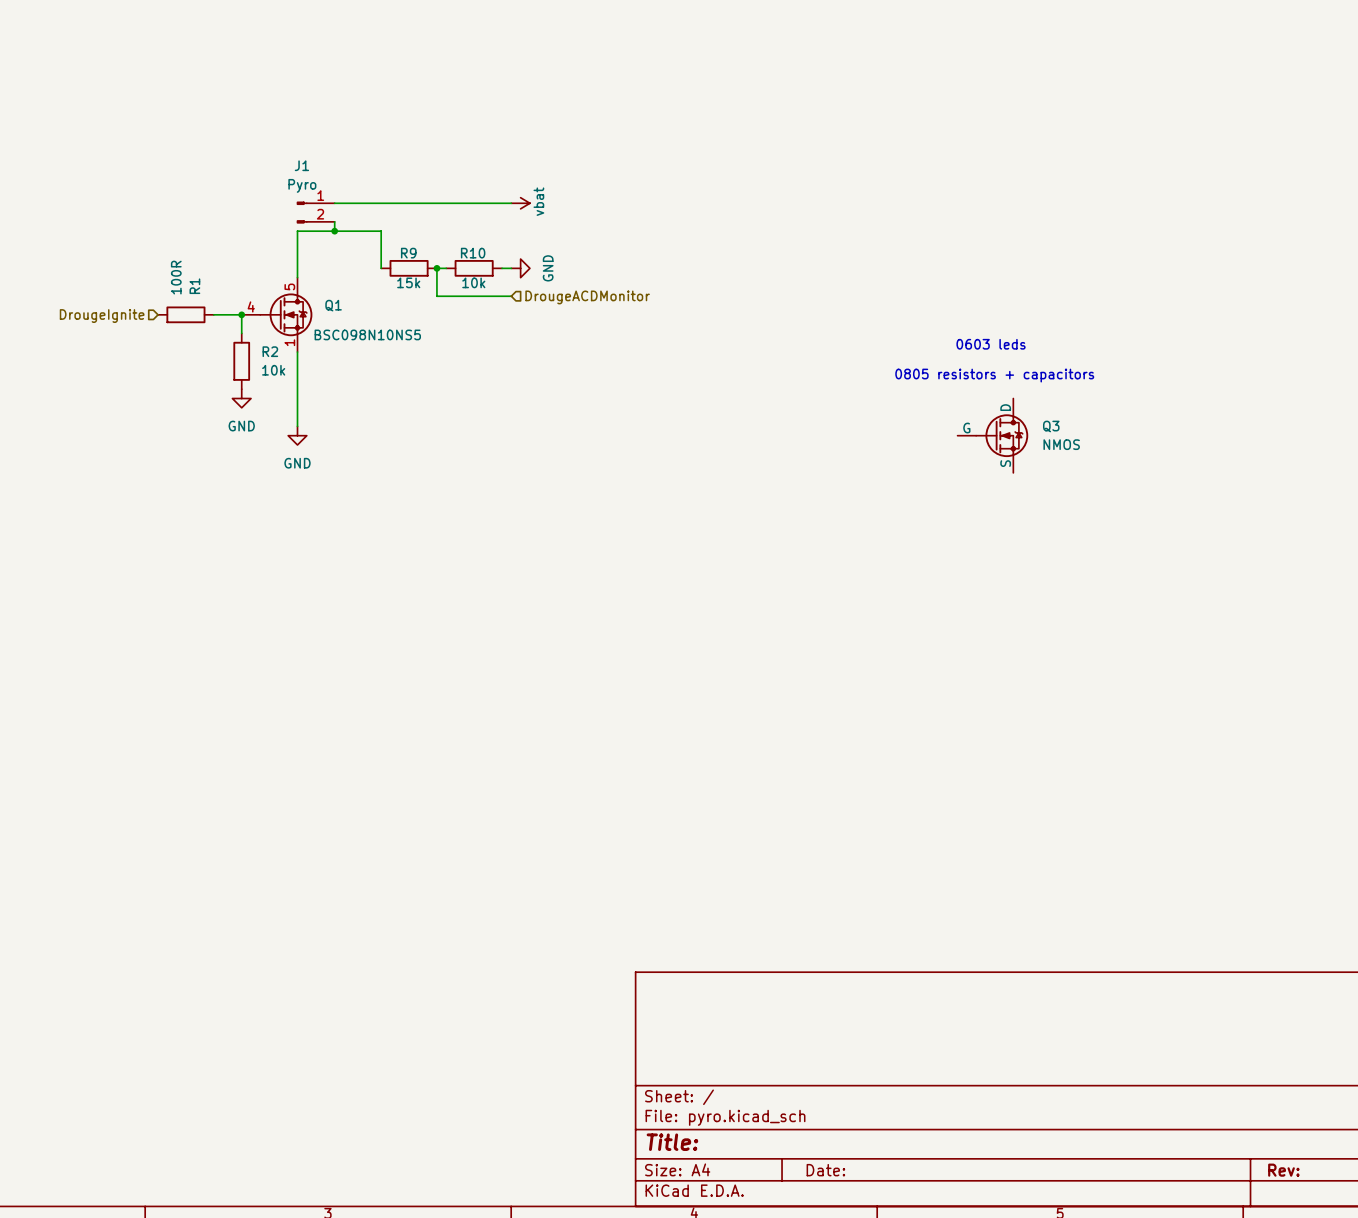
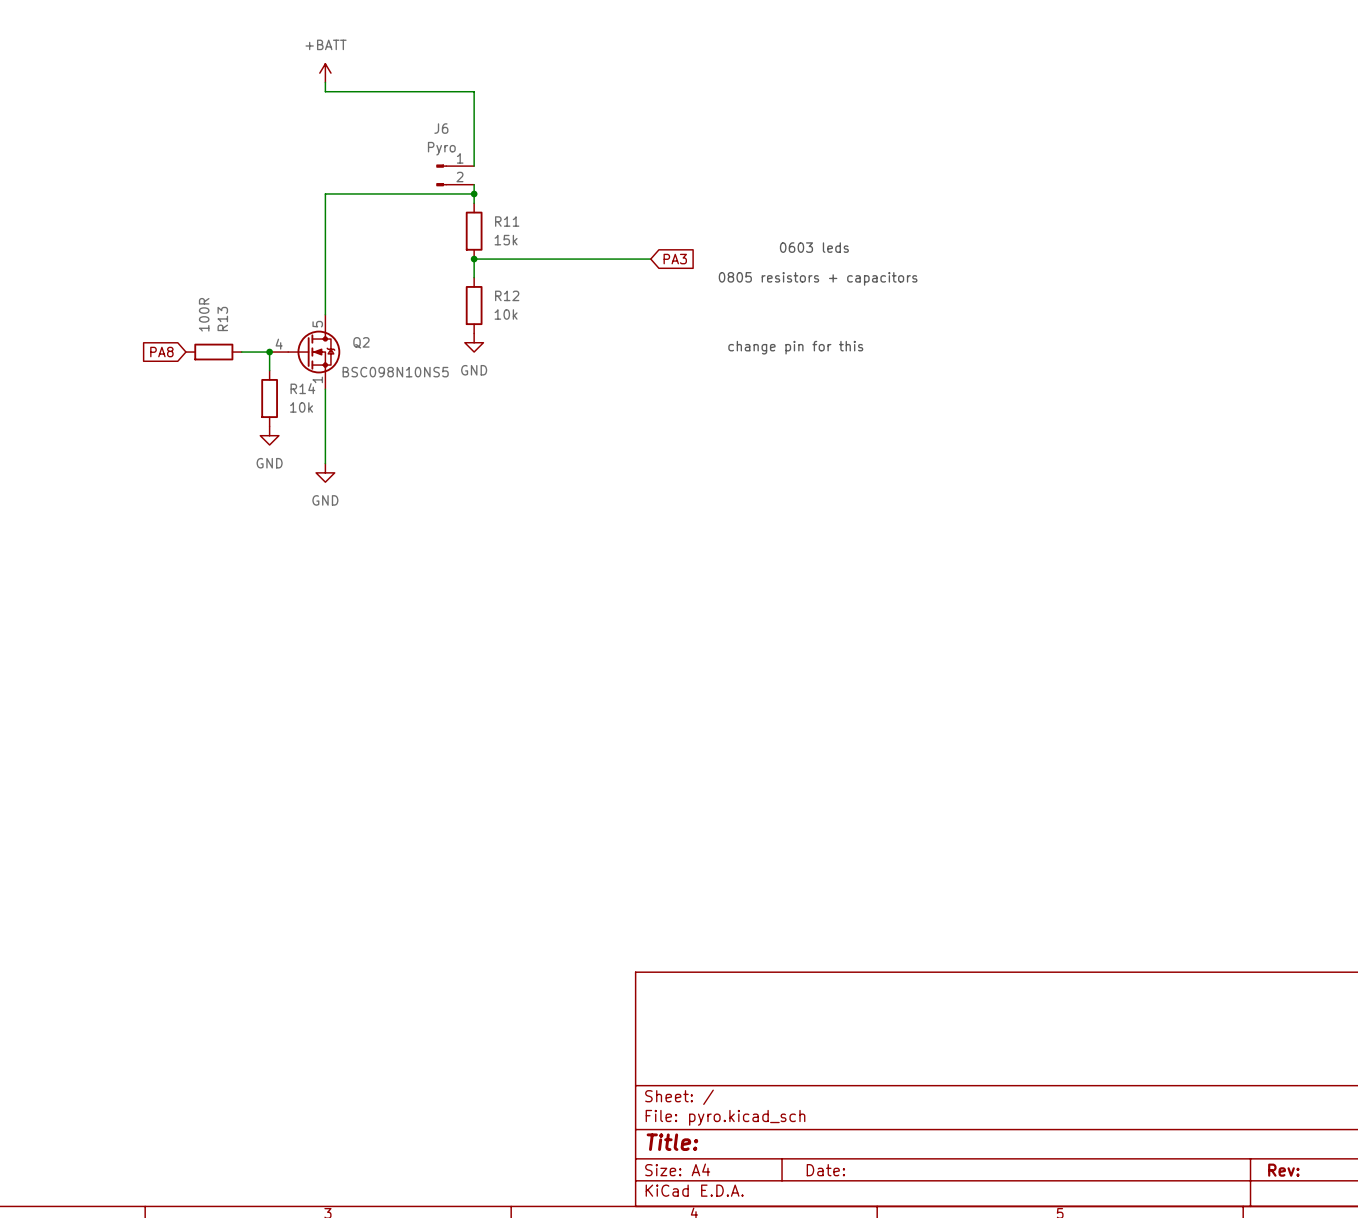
power symbol: none -> +BATT (325, 73)
wire: none -> (325, 82) (325, 91) (474, 91) (474, 166)
J6: none -> Pyro (455, 175)
wire: none -> (474, 184) (474, 203)
wire: none -> (474, 193) (325, 193) (325, 314)
junction: none -> (474, 193)
wire: (334, 203) (511, 203) -> none
power symbol: vbat (520, 203) -> none
J1: Pyro (315, 212) -> none
wire: (334, 221) (334, 231) -> none
junction: (334, 231) -> none
R11: none -> 15k (474, 231)
text: none -> 0603 leds (814, 247)
wire: none -> (650, 259) (474, 259) (474, 277)
global label: none -> PA3 (675, 259)
wire: (381, 268) (381, 231) (297, 231) (297, 277) -> none
R9: 15k (409, 268) -> none
junction position: (436, 268) -> (474, 259)
wire: (446, 268) (436, 268) (436, 296) (511, 296) -> none
R10: 10k (474, 268) -> none
wire: (502, 268) (511, 268) -> none
power symbol rotation: 0° (520, 268) -> 90° clockwise (474, 342)
power symbol position: GND (520, 268) -> GND (474, 342)
text: none -> 0805 resistors + capacitors (818, 278)
hierarchical label: DrougeACDMonitor (587, 297) -> none
R12: none -> 10k (474, 305)
R1: 100R (185, 314) -> none
wire: (213, 314) (241, 314) (241, 333) -> (241, 352) (269, 352) (269, 370)
junction: (241, 314) -> none
Q1: BSC098N10NS5 (277, 314) -> none
hierarchical label: DrougeIgnite (102, 316) -> none
text: 0603 leds (991, 344) -> none
text: none -> change pin for this (795, 347)
global label: none -> PA8 (161, 352)
R13: none -> 100R (213, 352)
junction: none -> (269, 352)
wire: (297, 352) (297, 426) -> (325, 389) (325, 463)
Q2: none -> BSC098N10NS5 (304, 352)
R2: 10k (241, 361) -> none
text: 0805 resistors + capacitors (994, 375) -> none
power symbol: GND (241, 398) -> none
R14: none -> 10k (269, 398)
power symbol: none -> GND (269, 435)
power symbol: GND (297, 435) -> none
Q3: NMOS (992, 435) -> none
power symbol: none -> GND (325, 472)

